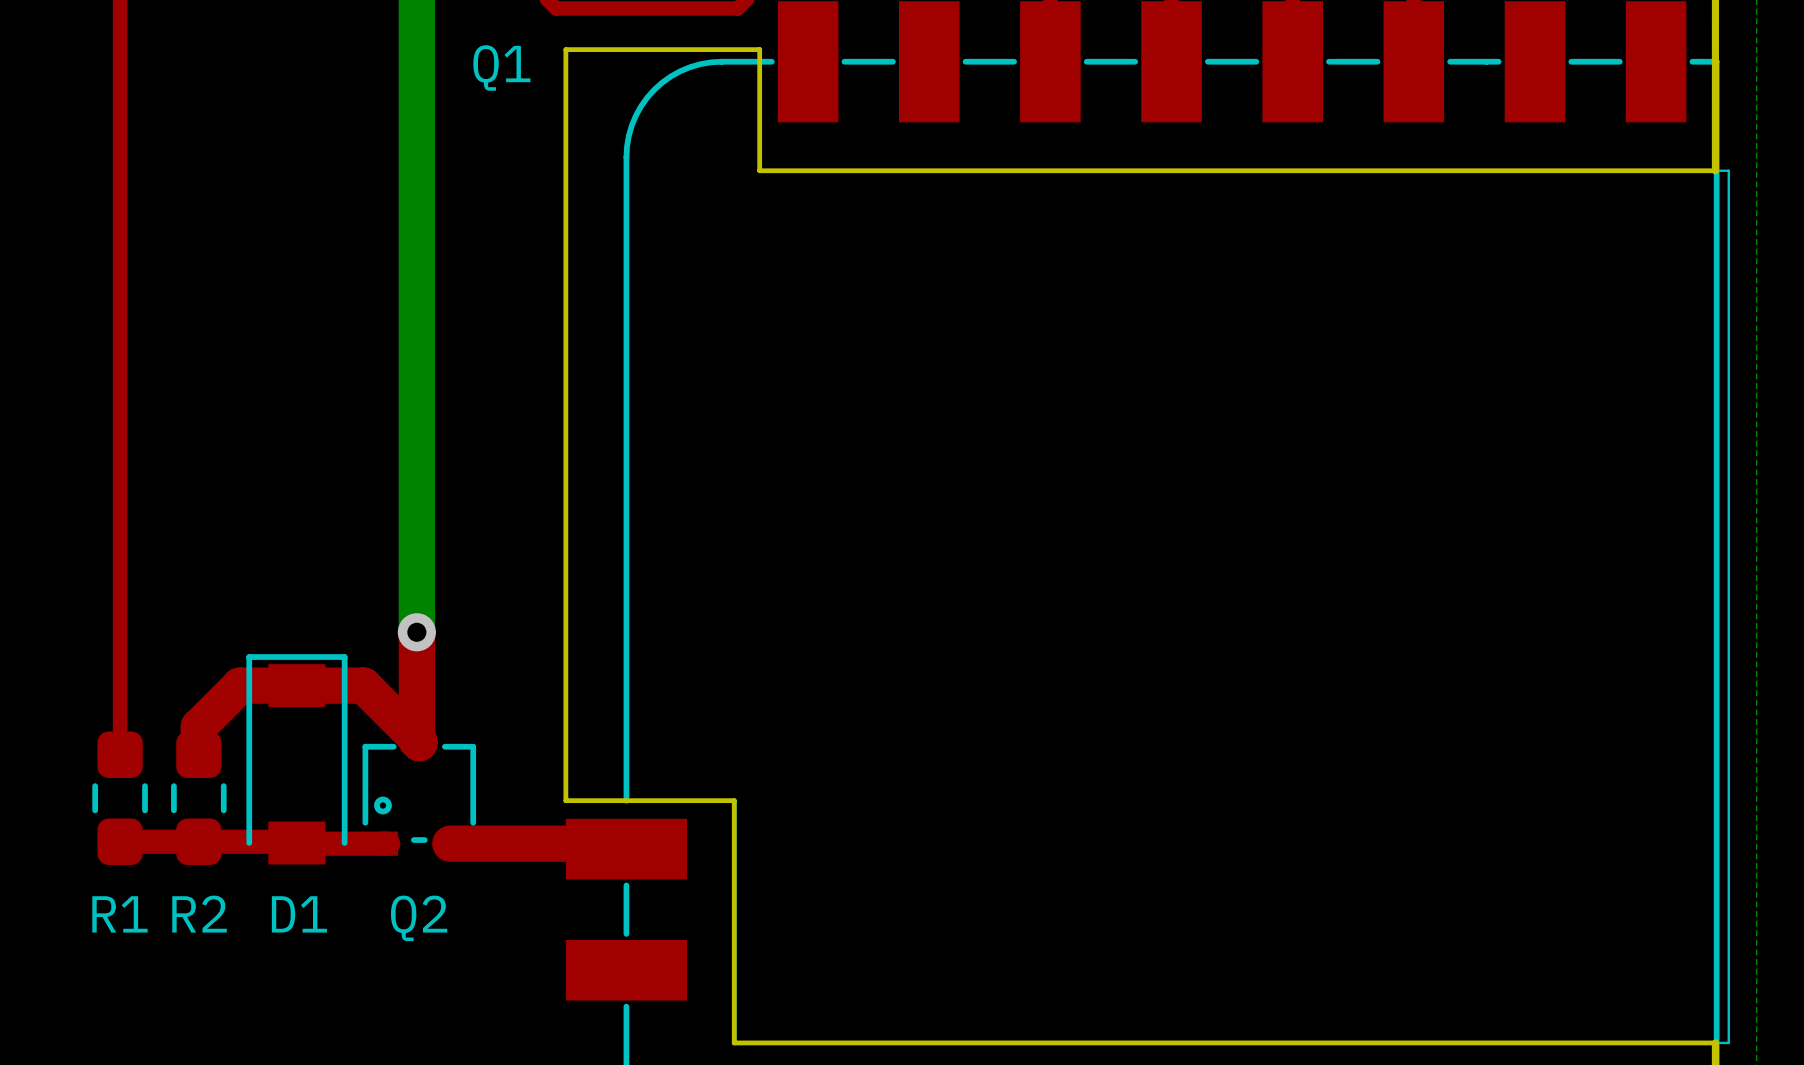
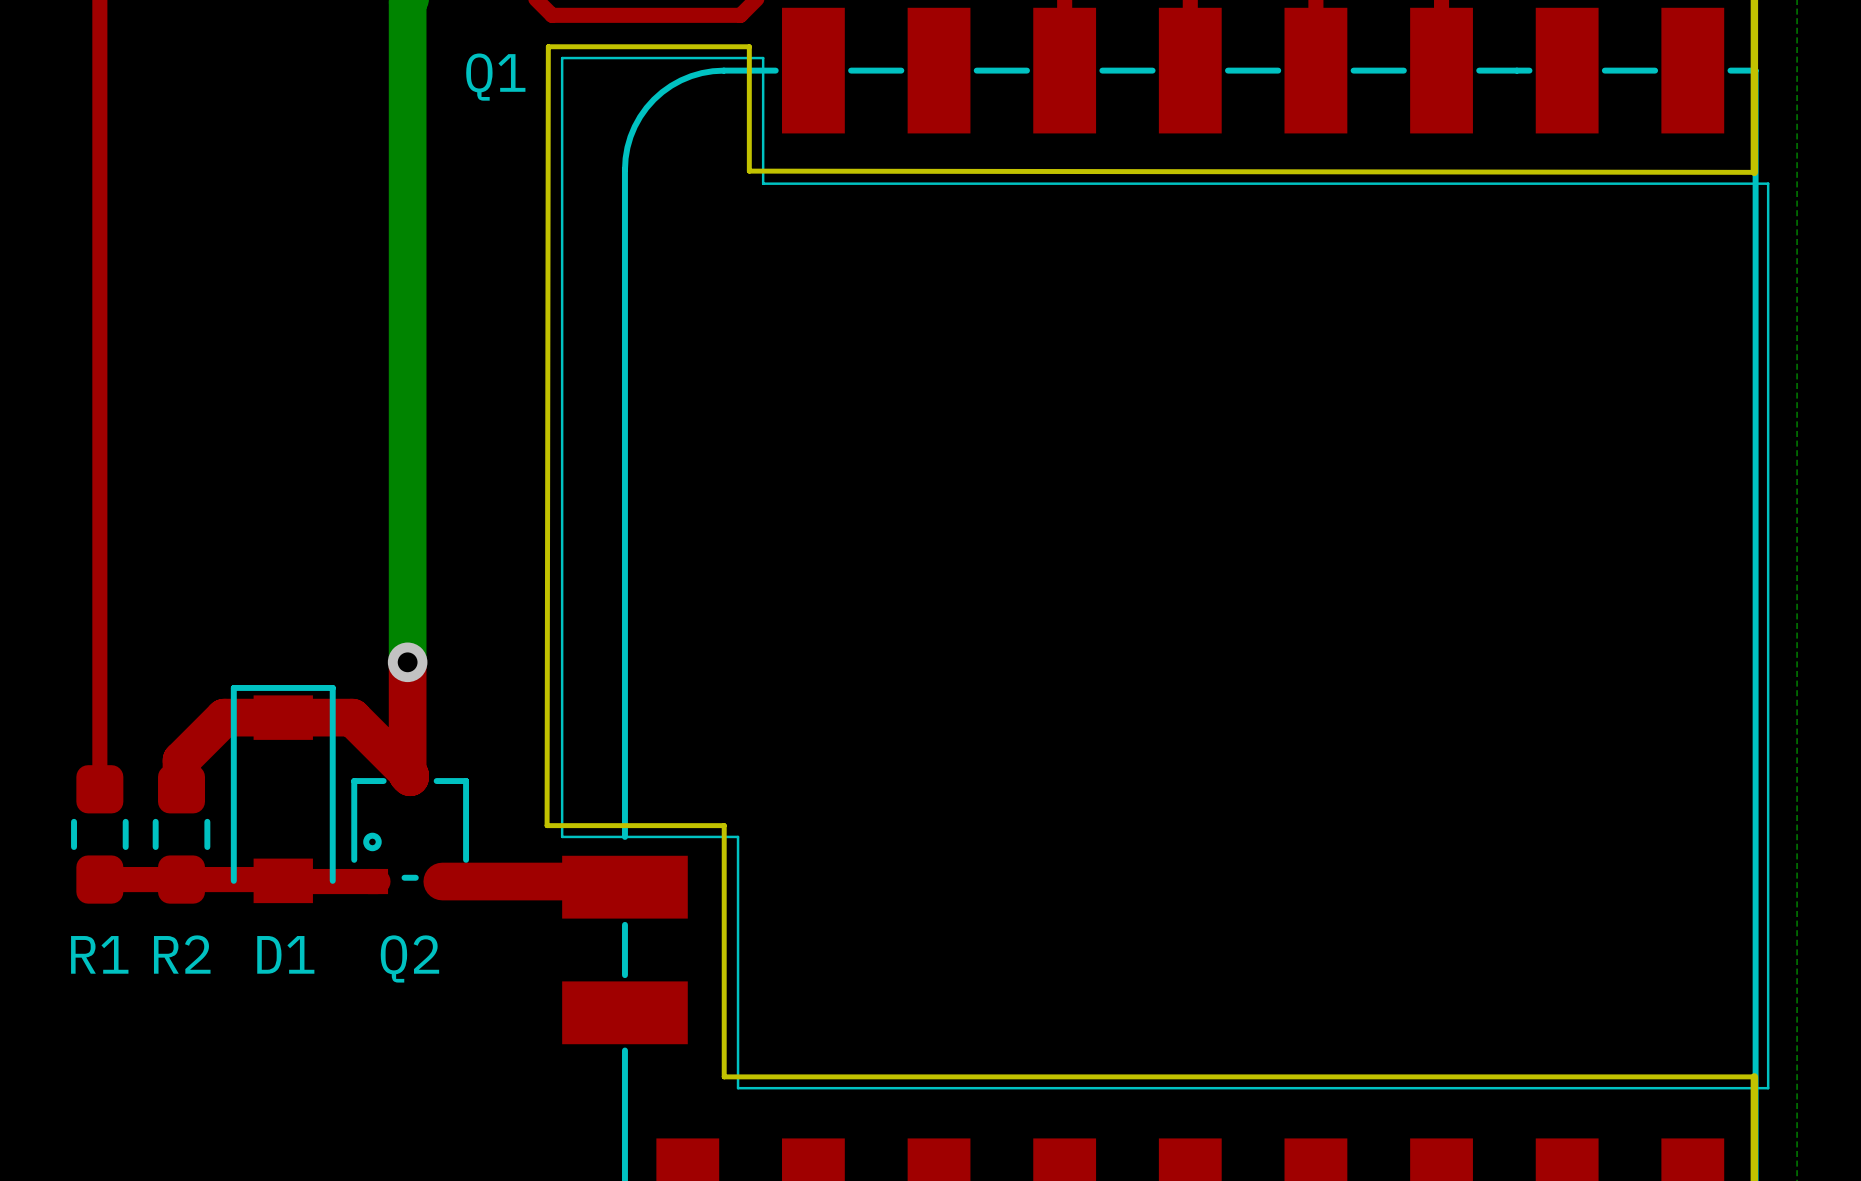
board edge: (1715, 159) (1715, 170) (759, 170) (759, 49) (565, 49) (565, 800) (734, 800) (734, 1042) (1715, 1042) -> (1754, 172) (749, 171) (749, 46) (548, 46) (547, 825) (724, 825) (724, 1076) (1754, 1076) (1754, 1088)

